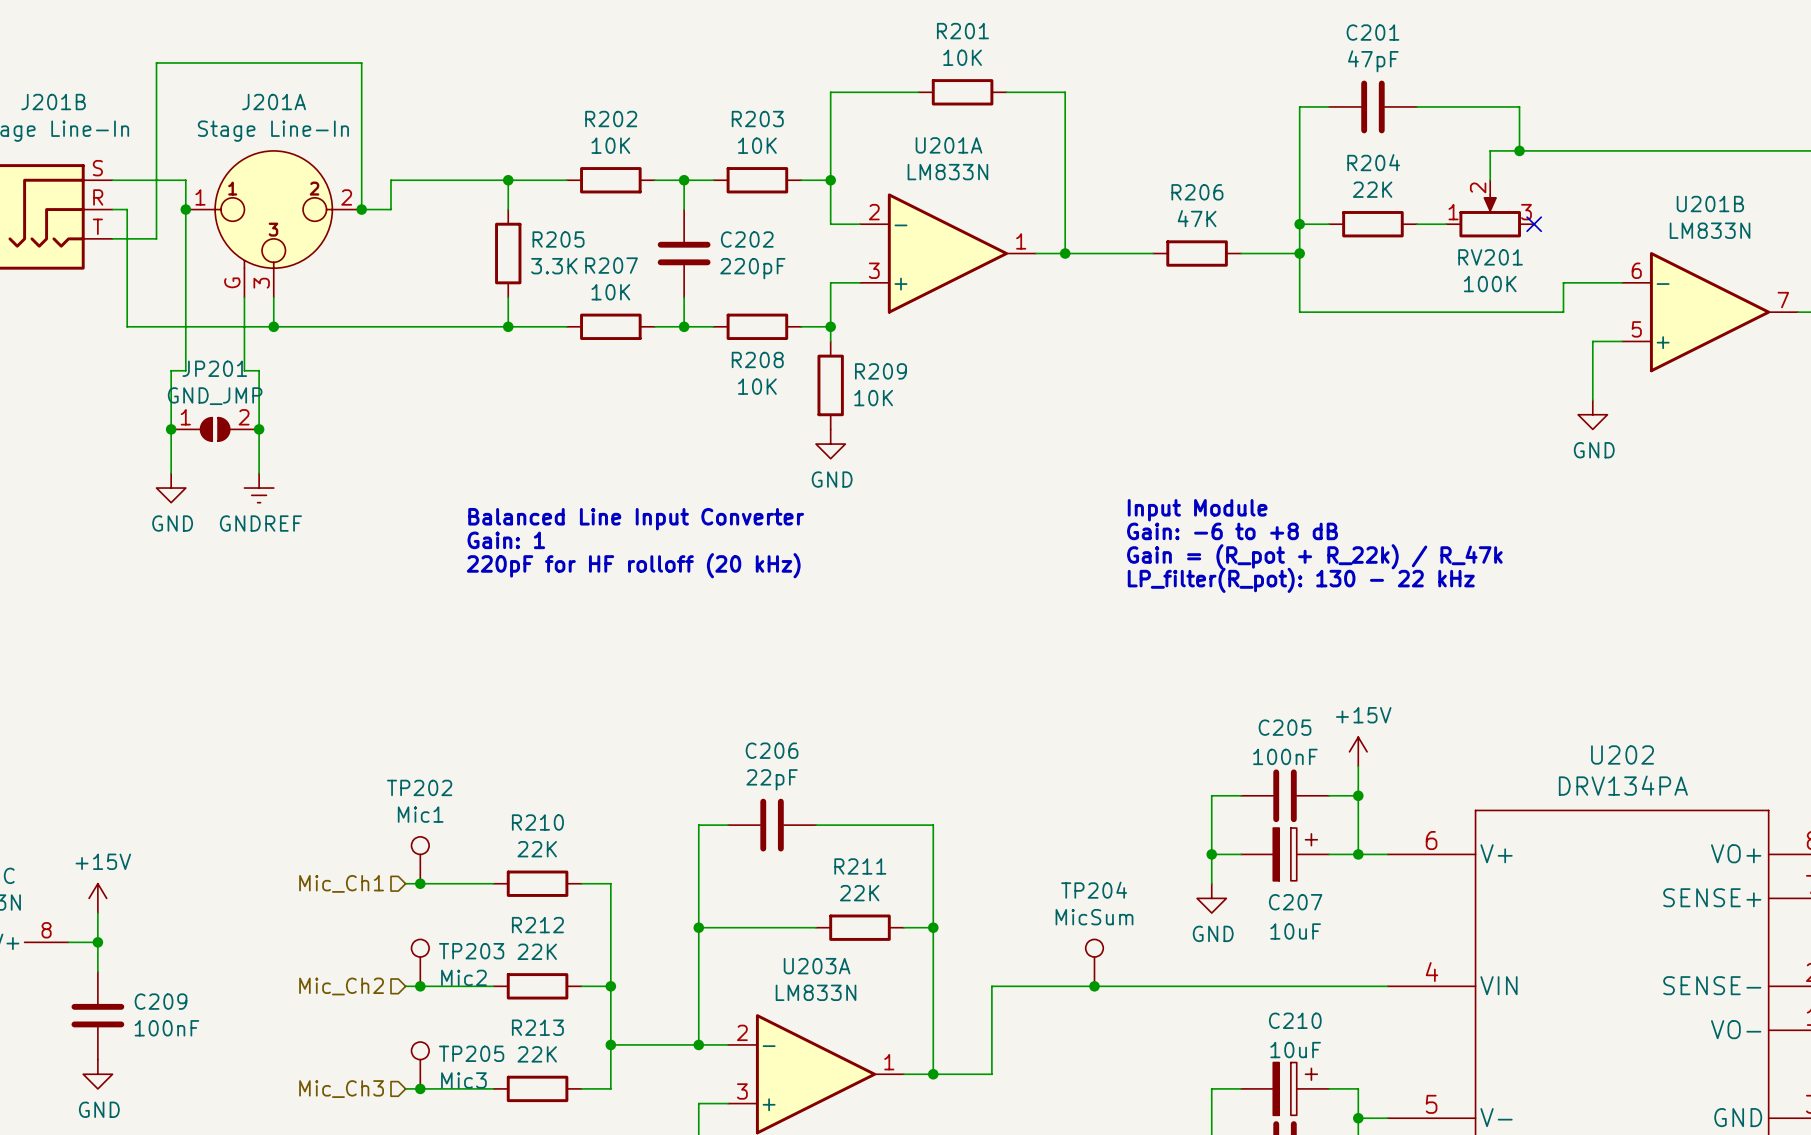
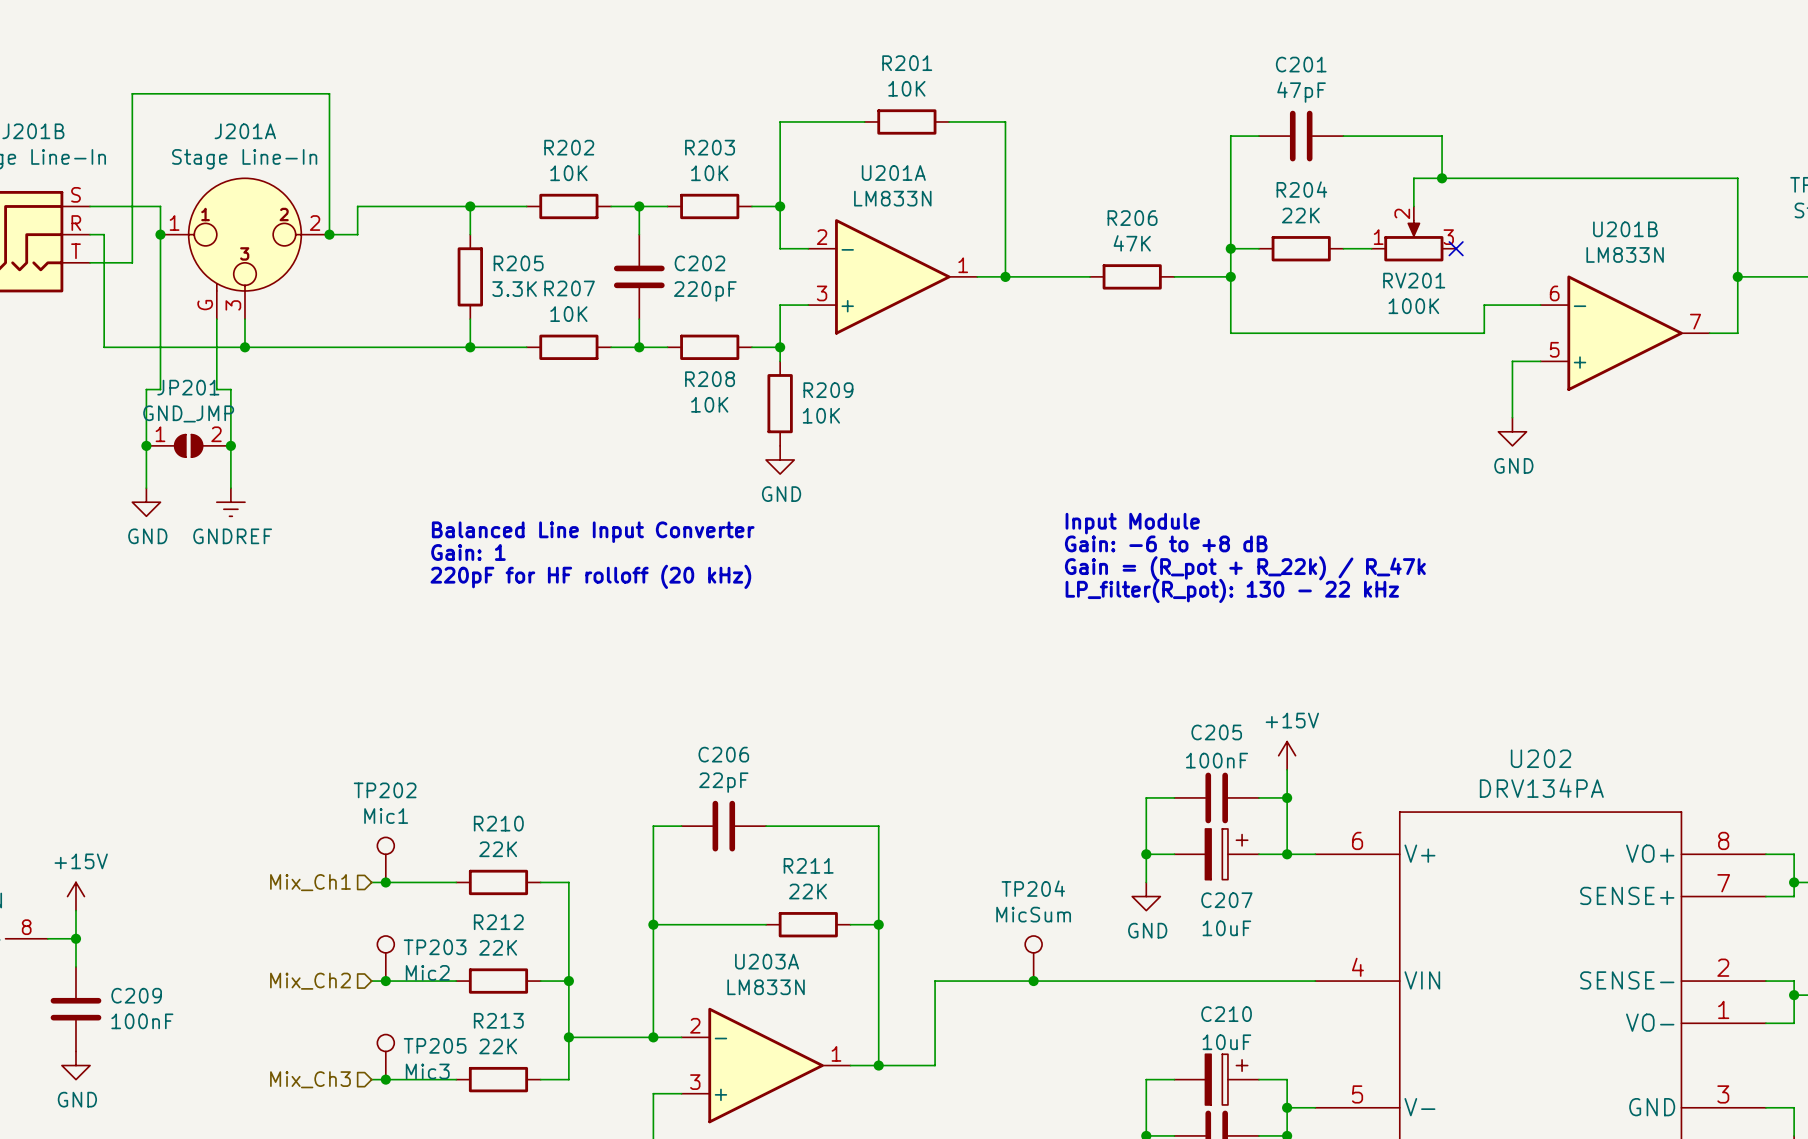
hierarchical label: Mic_Ch1 (341, 883) -> Mix_Ch1 (310, 882)
hierarchical label: Mic_Ch2 (341, 986) -> Mix_Ch2 (310, 981)
hierarchical label: Mic_Ch3 (341, 1089) -> Mix_Ch3 (310, 1079)

